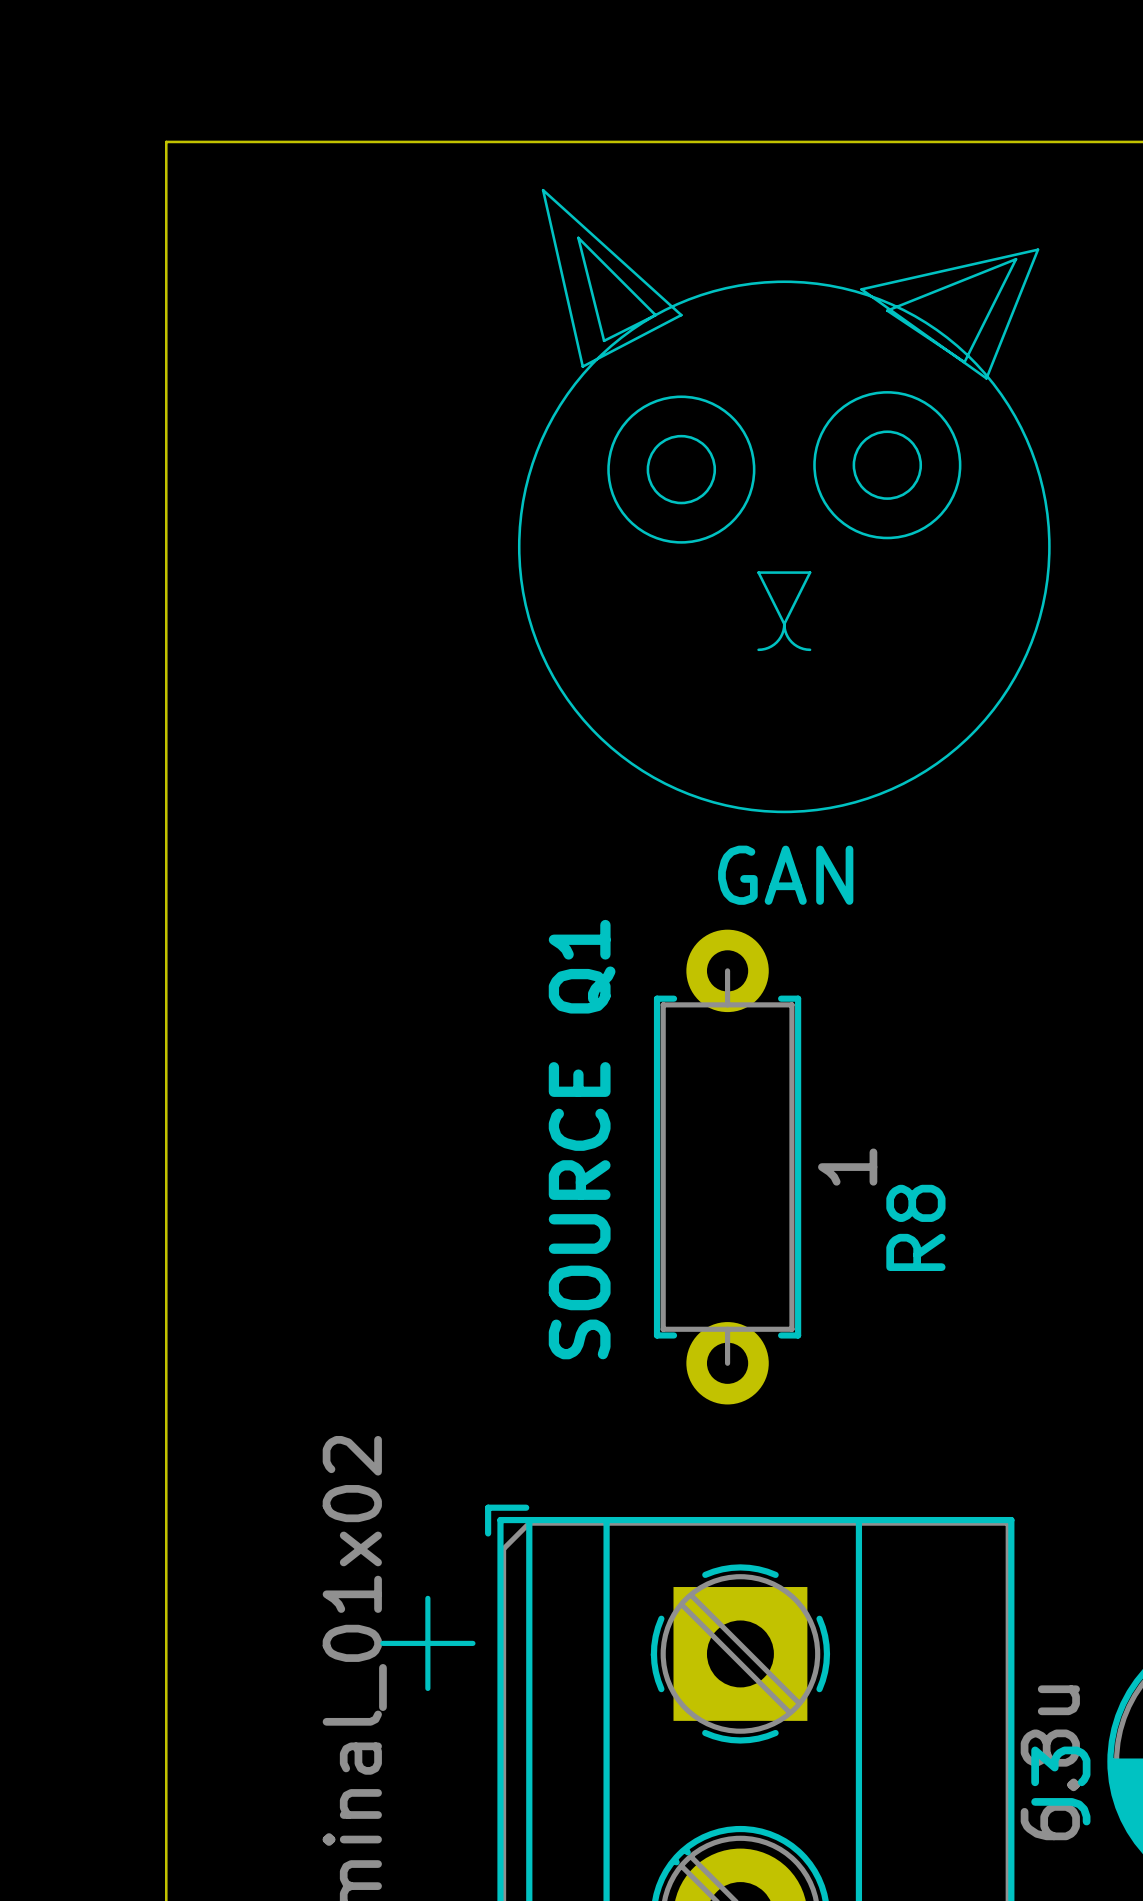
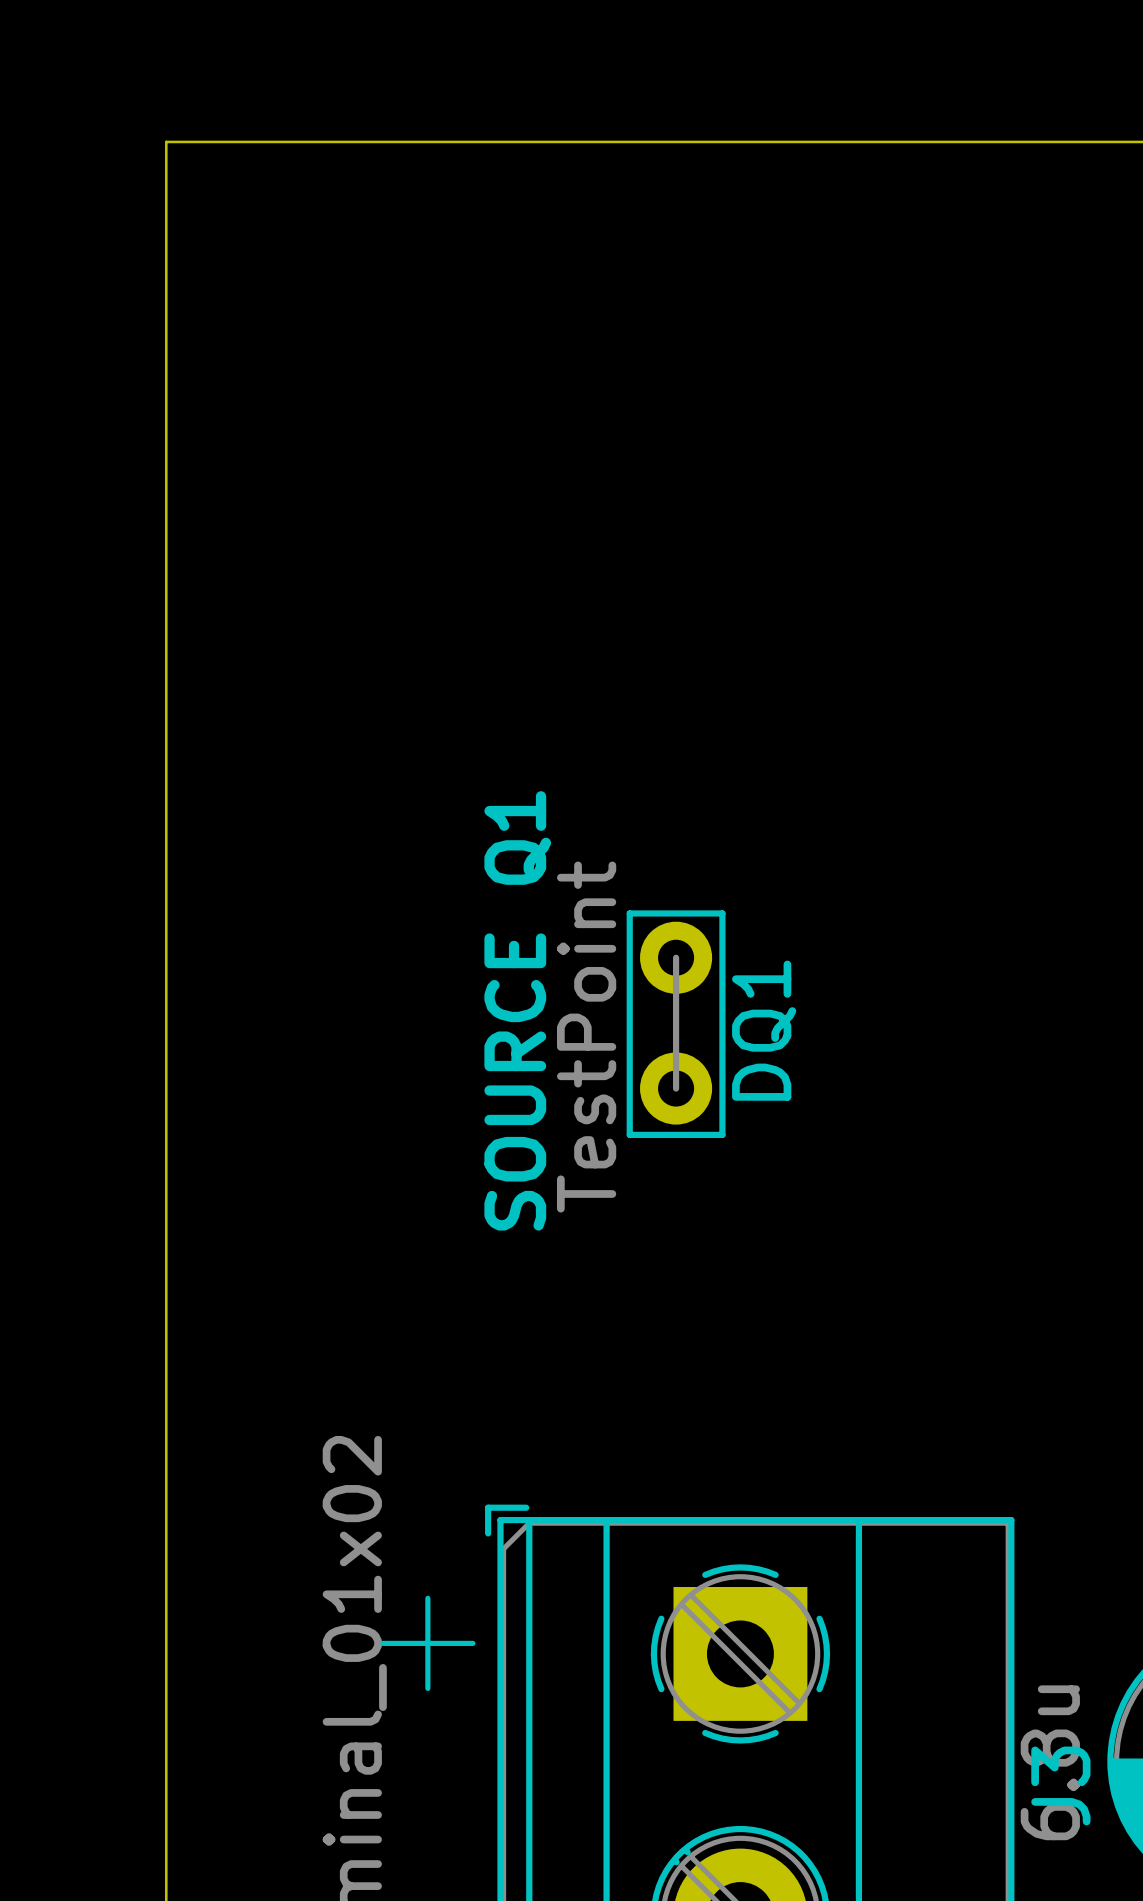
line: (543, 190) (582, 366) (681, 315) (543, 190) -> none
line: (578, 237) (604, 340) (655, 315) (578, 237) -> none
line: (1038, 249) (861, 289) (986, 378) (1038, 249) -> none
line: (1016, 259) (887, 310) (964, 362) (1016, 259) -> none
drawing: [517, 280, 1051, 814] -> none
line: (784, 624) (810, 572) (758, 572) (784, 624) -> none
line: (784, 624) (782, 633) (776, 642) (768, 647) (758, 649) -> none
line: (784, 624) (786, 633) (791, 642) (800, 647) (810, 649) -> none
text: GAN (785, 875) -> none
DQ1: none -> TestPoint (676, 1024)
text position: SOURCE Q1 (582, 1139) -> SOURCE Q1 (517, 1010)
R8: 1 (727, 1167) -> none

